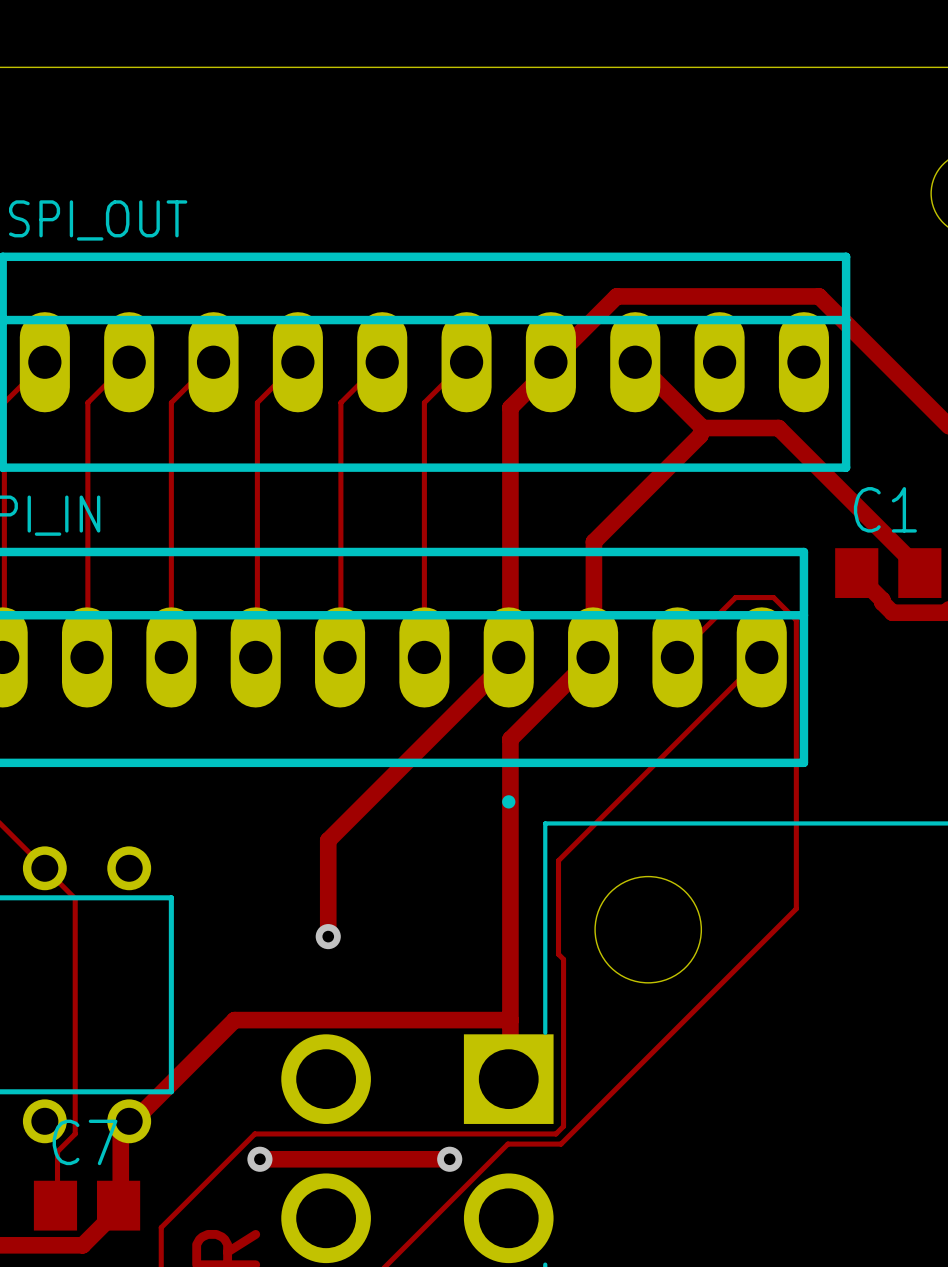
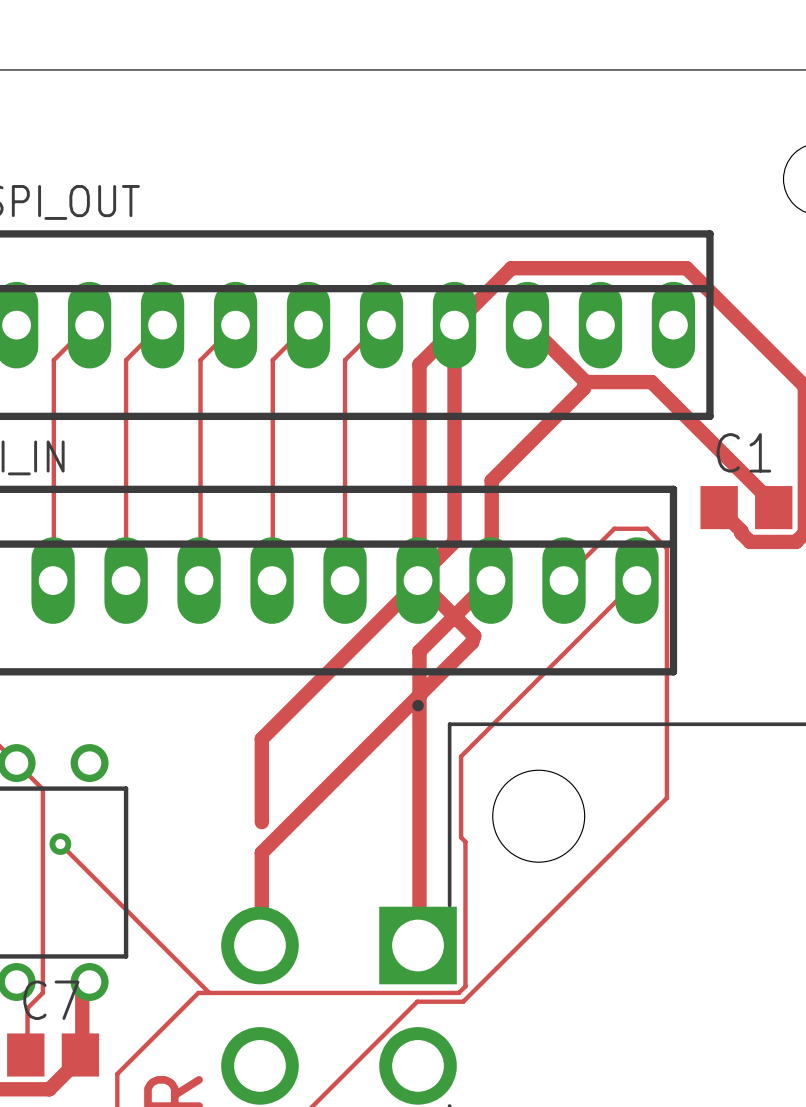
track: none -> (454, 325) (454, 541) (418, 580) (474, 636) (472, 642) (261, 852) (261, 944) (259, 945)
via: (328, 936) -> none
track: none -> (60, 844) (209, 992)
via: none -> (60, 844)
track: (510, 1020) (234, 1020) (135, 1118) (129, 1121) -> none
track: (259, 1159) (449, 1159) -> none
via: (259, 1159) -> none
via: (449, 1159) -> none

